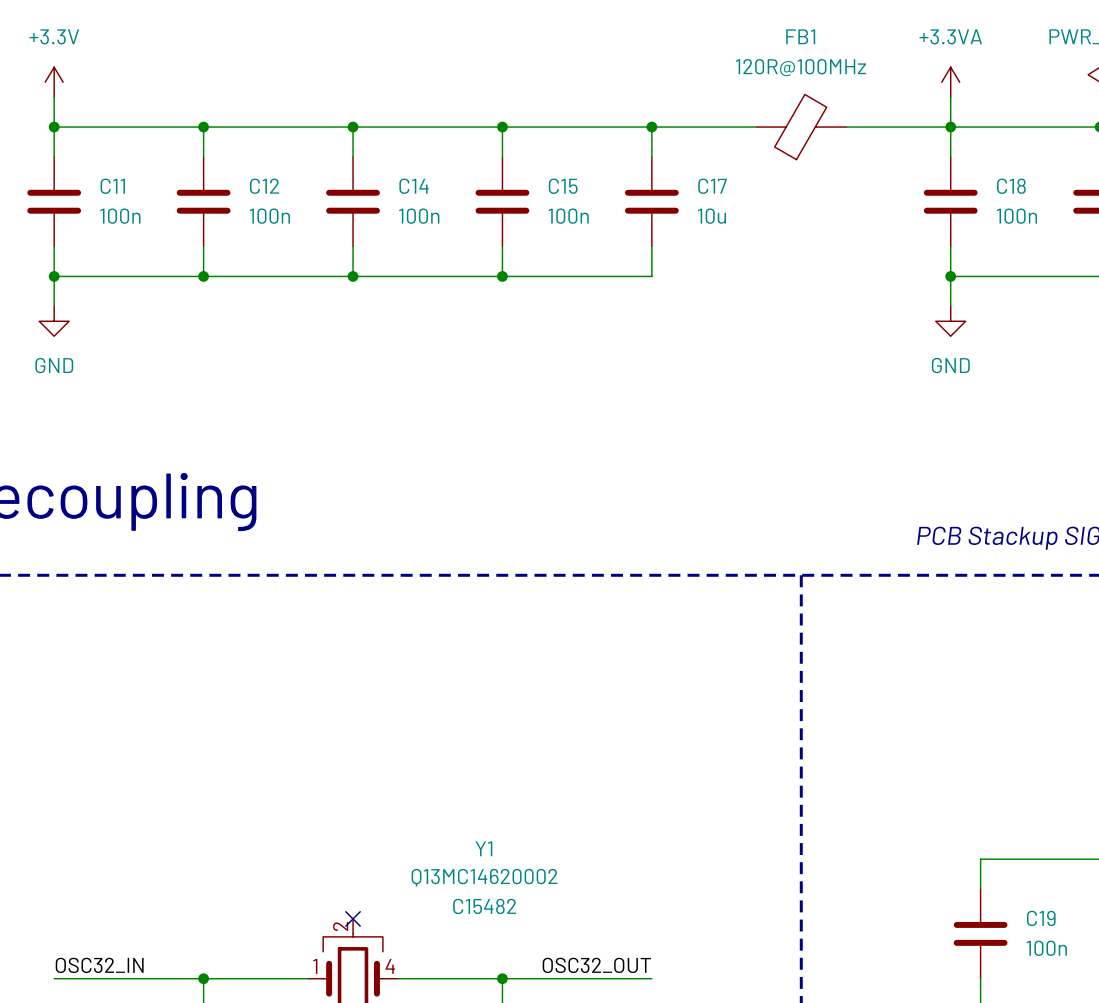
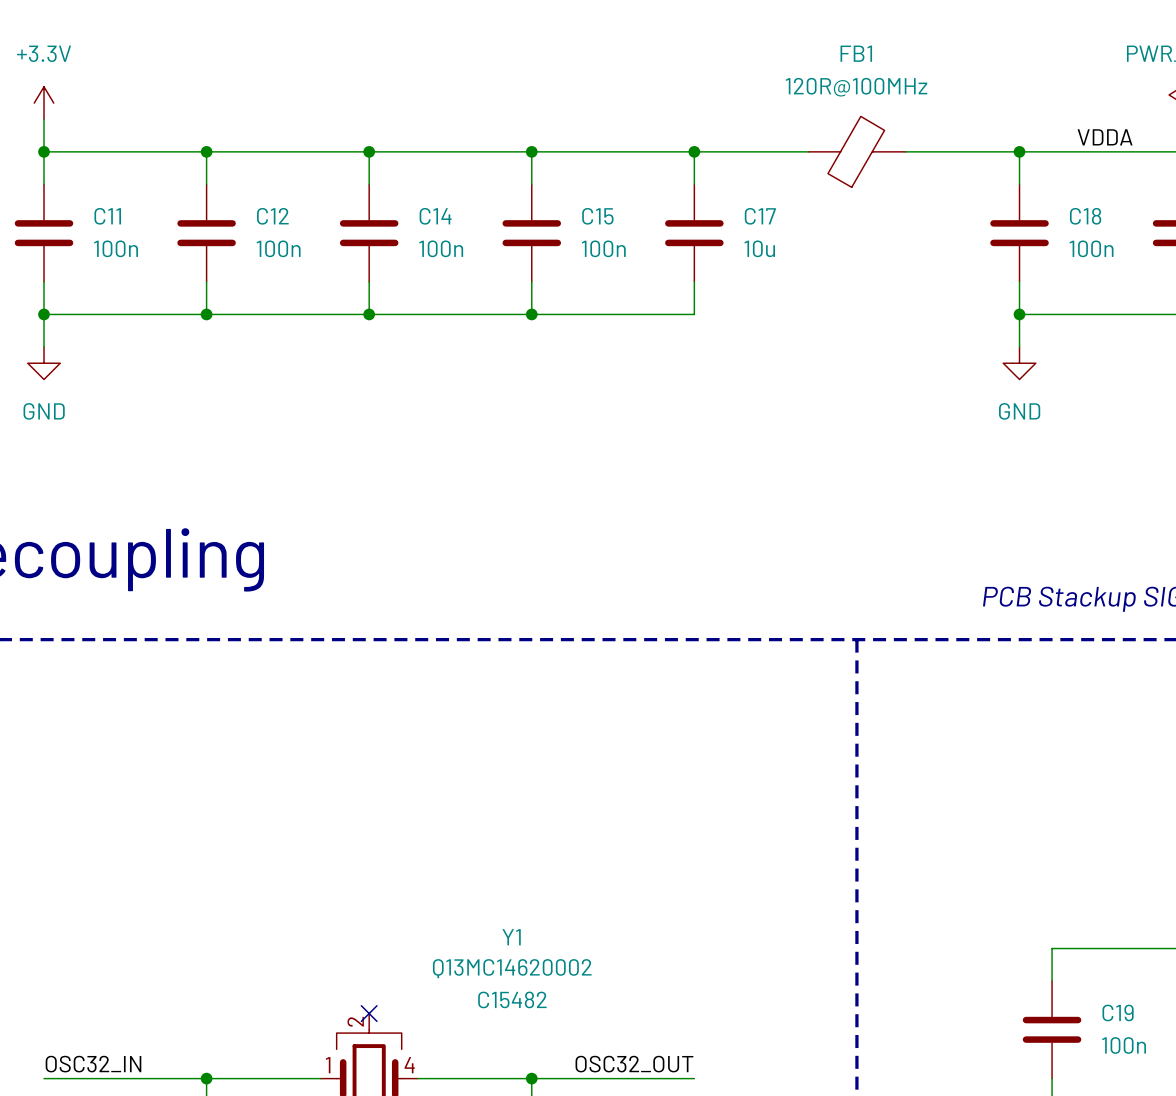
power symbol: +3.3VA (950, 82) -> none
wire: (950, 97) (950, 127) -> none
label: none -> VDDA (1105, 137)

